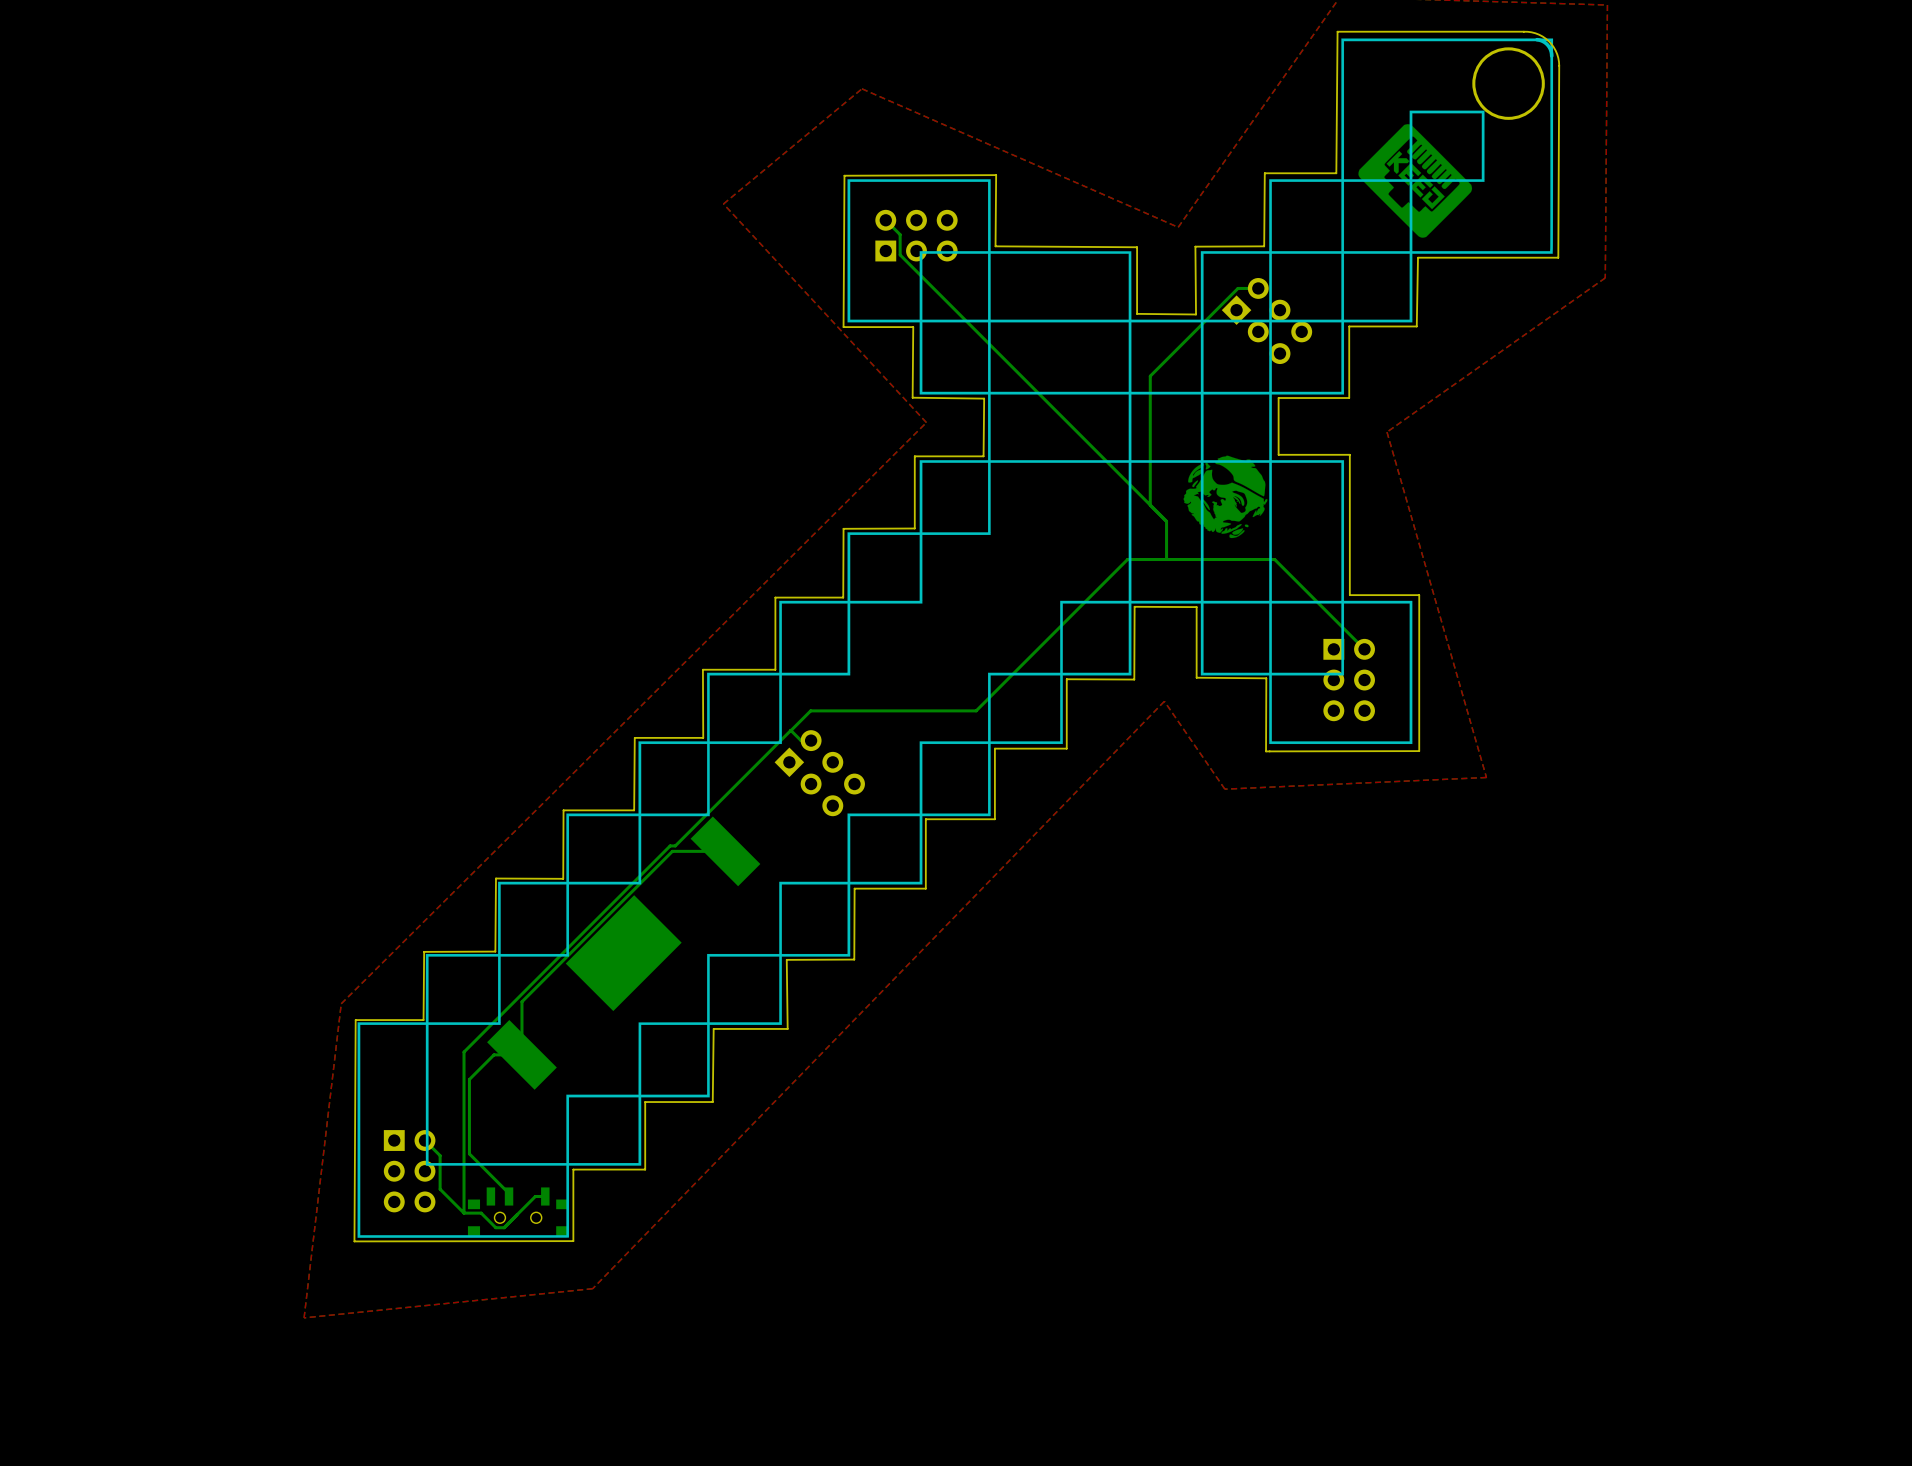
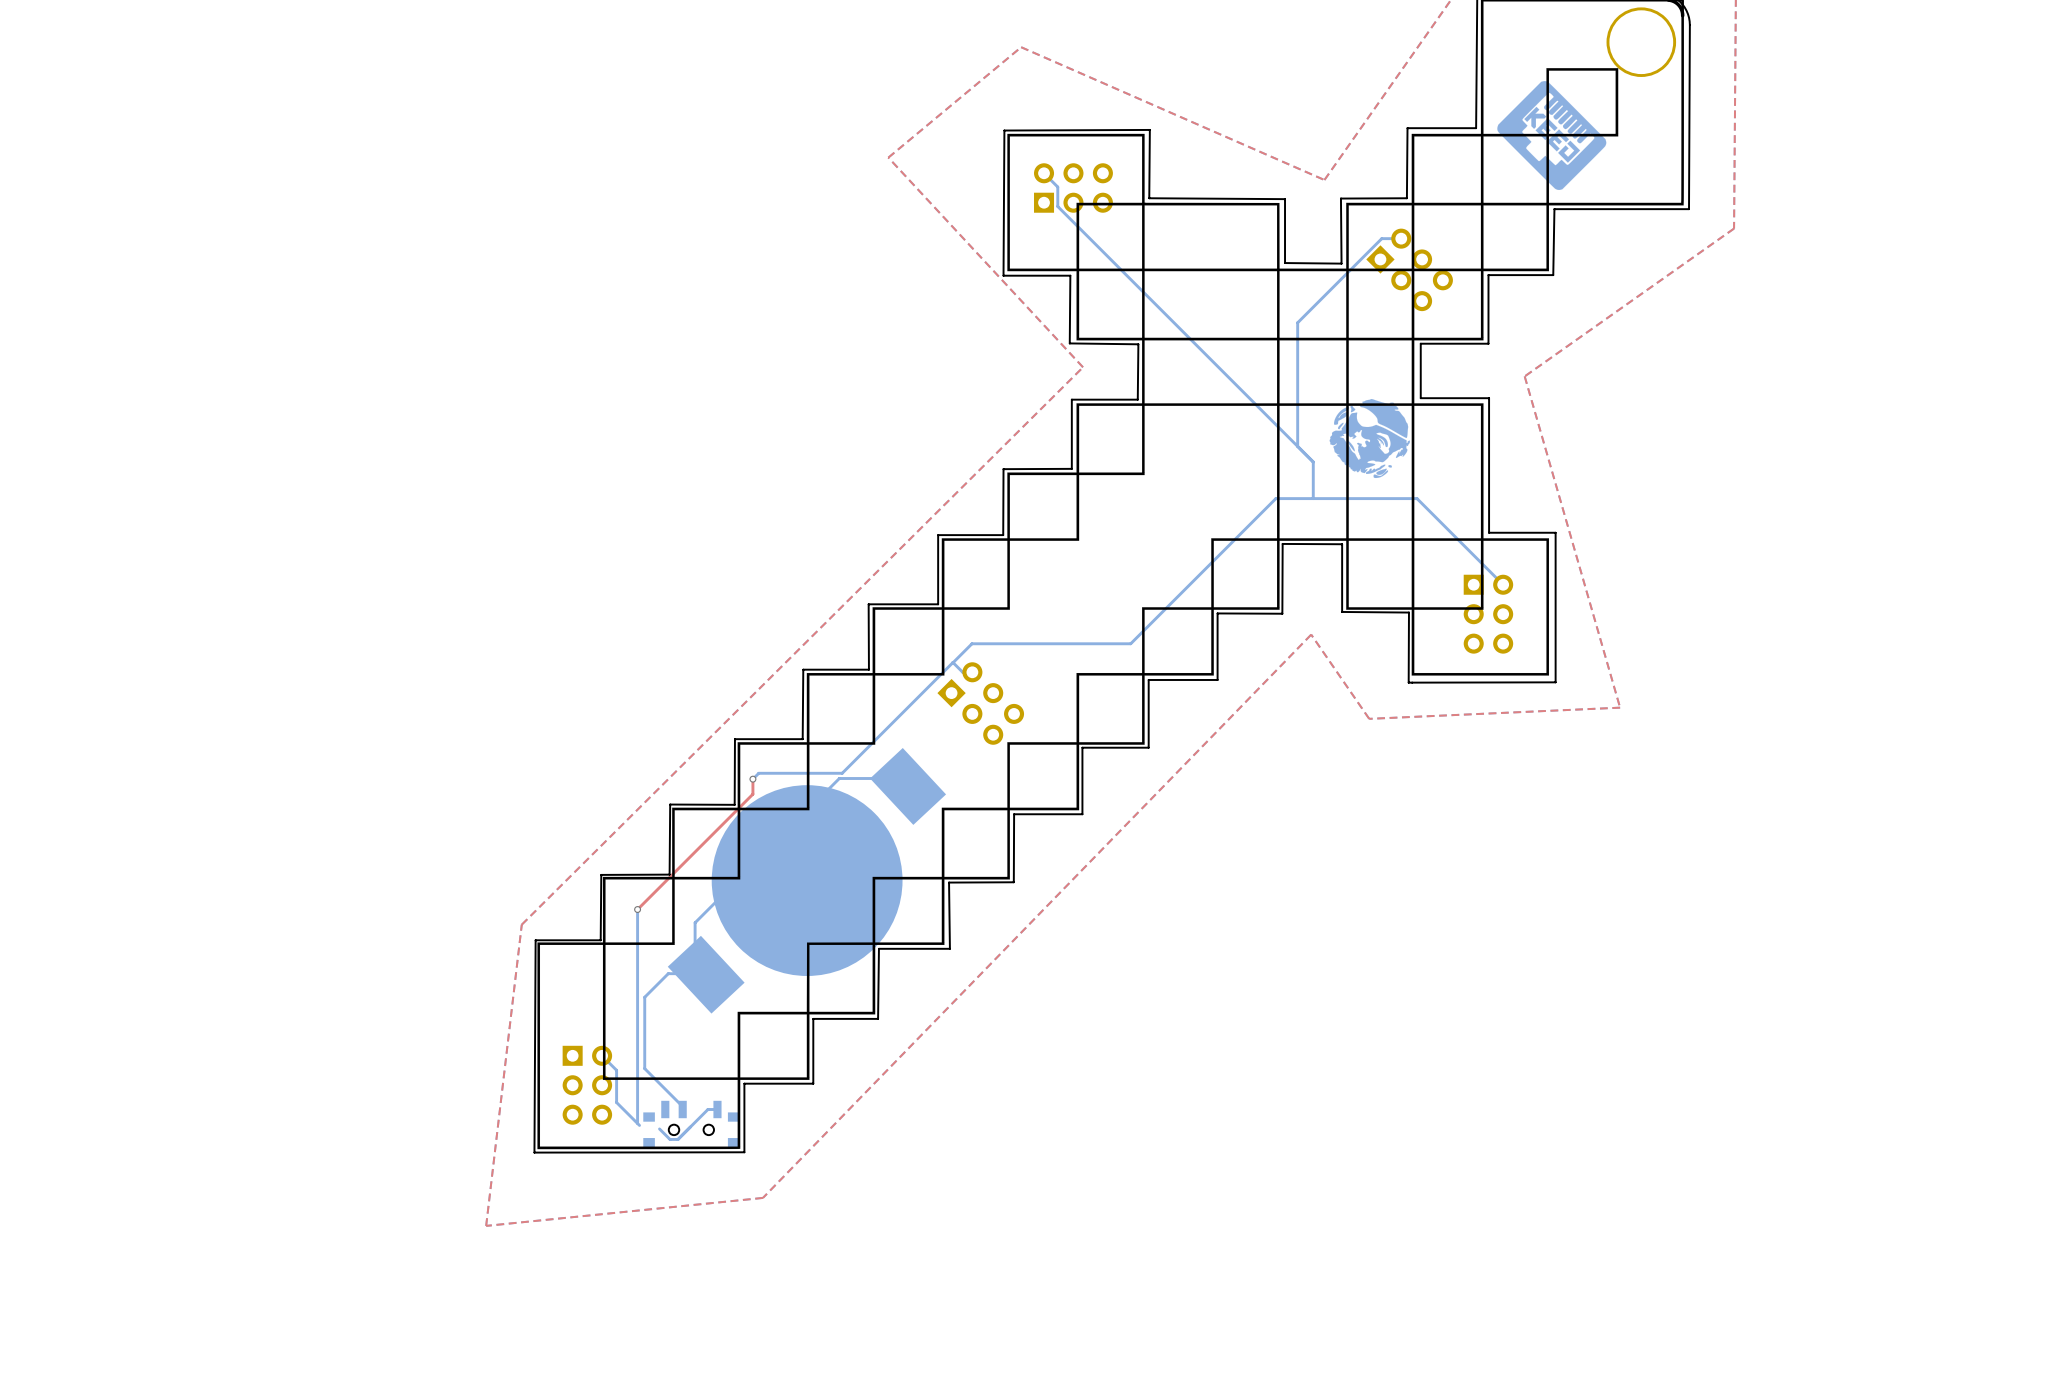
bottom track: (675, 845) (670, 845) (464, 1052) (464, 1213) (481, 1213) (484, 1216) -> (842, 773) (758, 773) (752, 779)
top track: none -> (752, 779) (752, 794) (637, 909)
via: none -> (752, 779)
part: (623, 953) -> none
part: none -> (806, 880)
bottom track: none -> (637, 909) (637, 1123)
via: none -> (637, 909)

